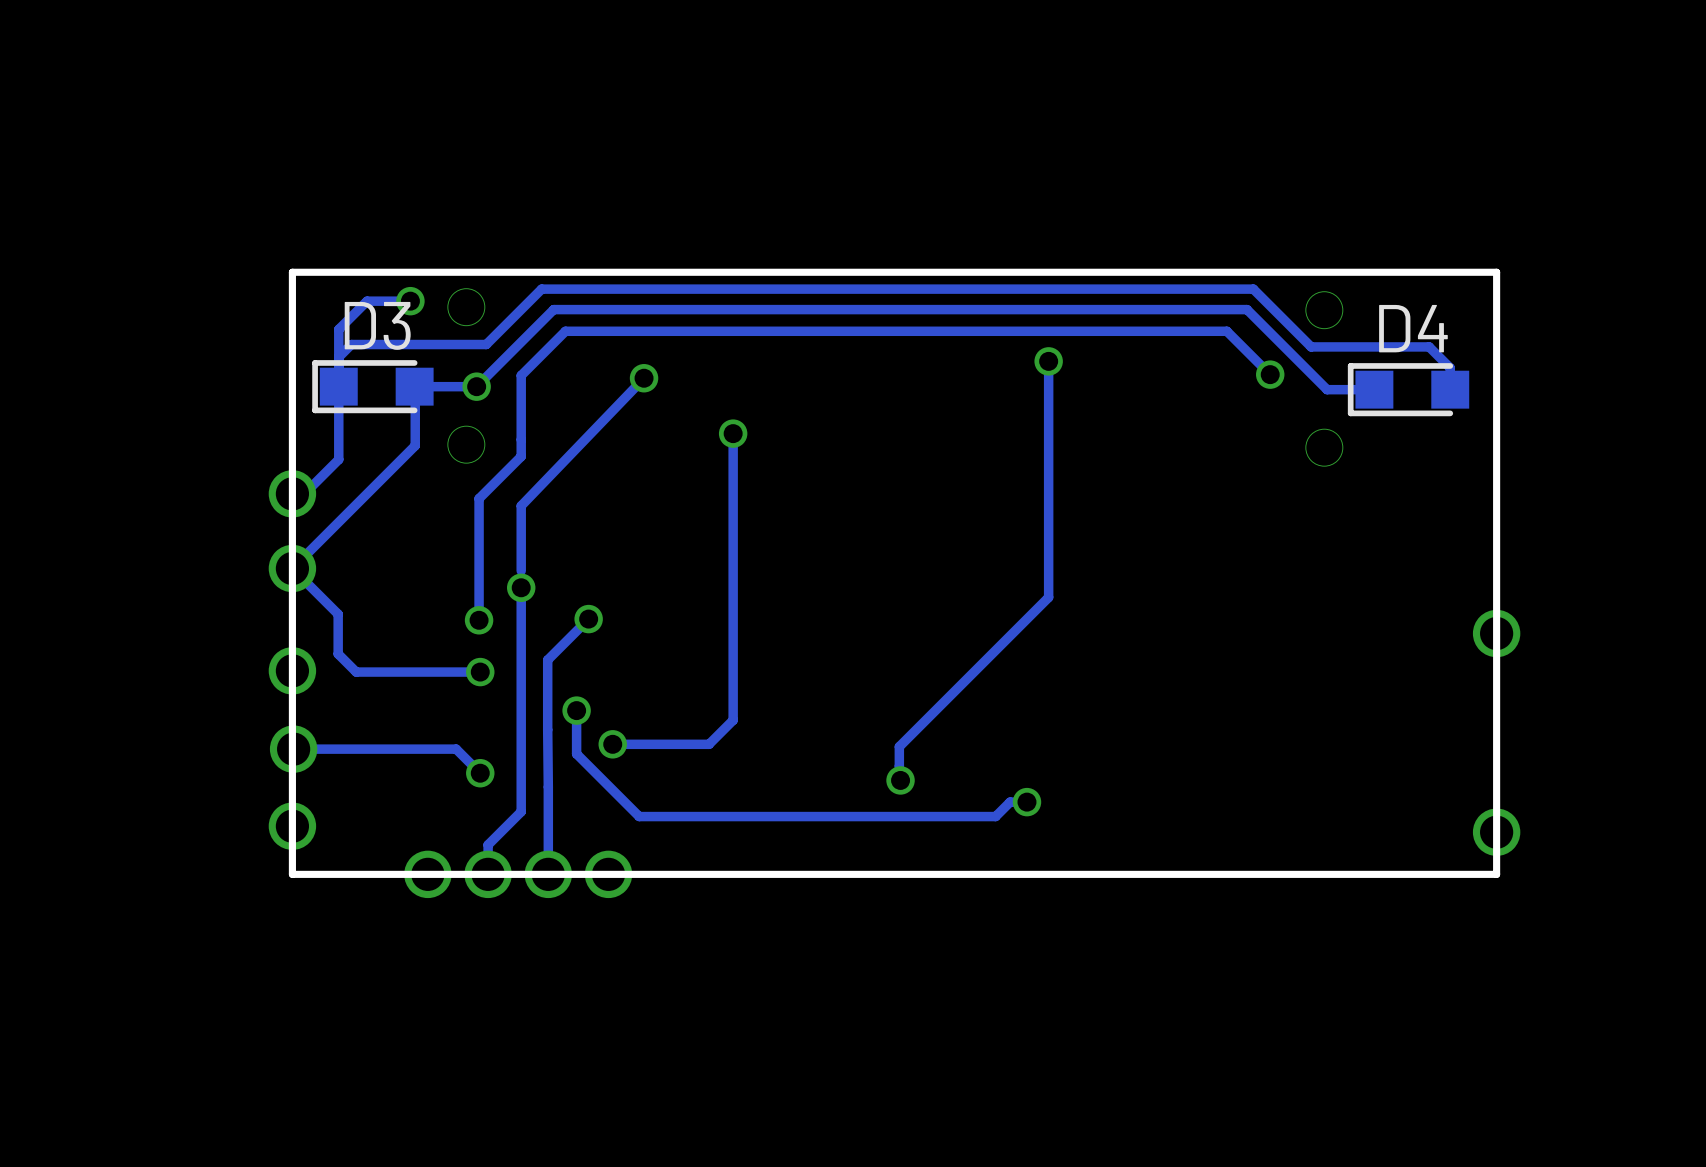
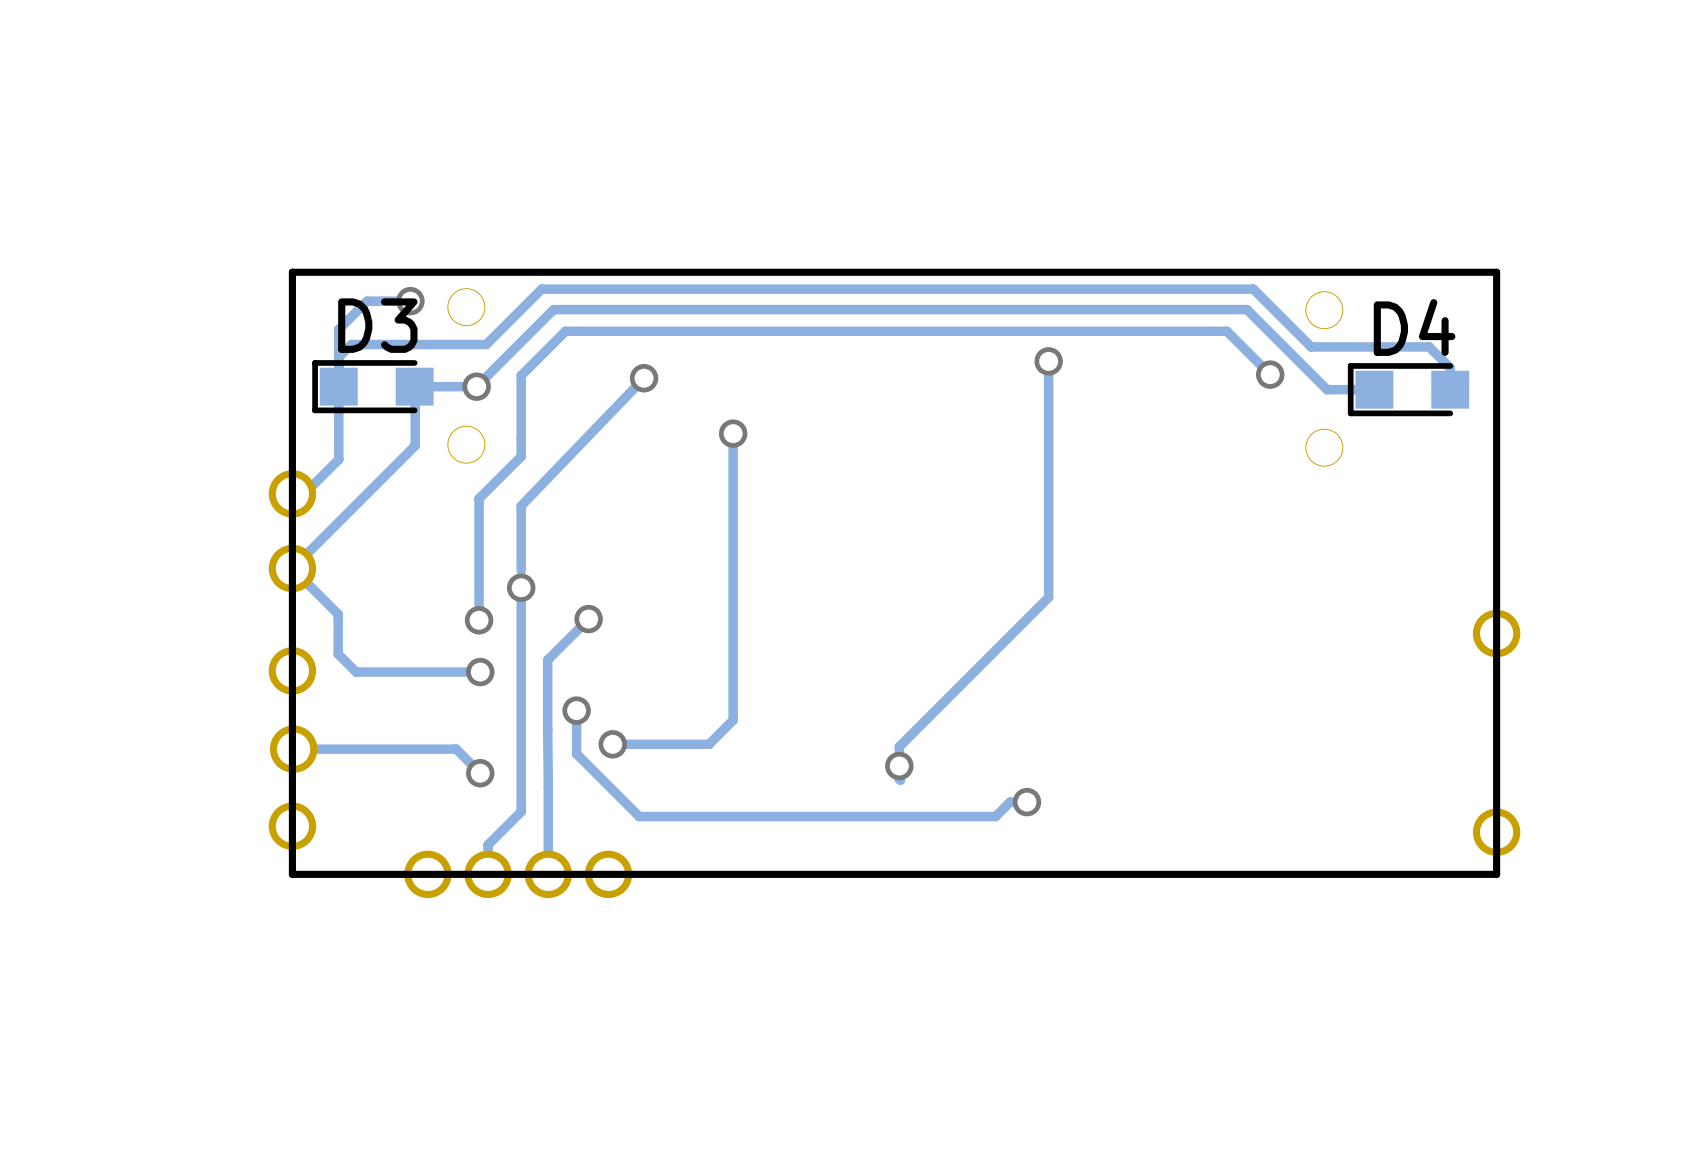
via position: (900, 780) -> (899, 765)

